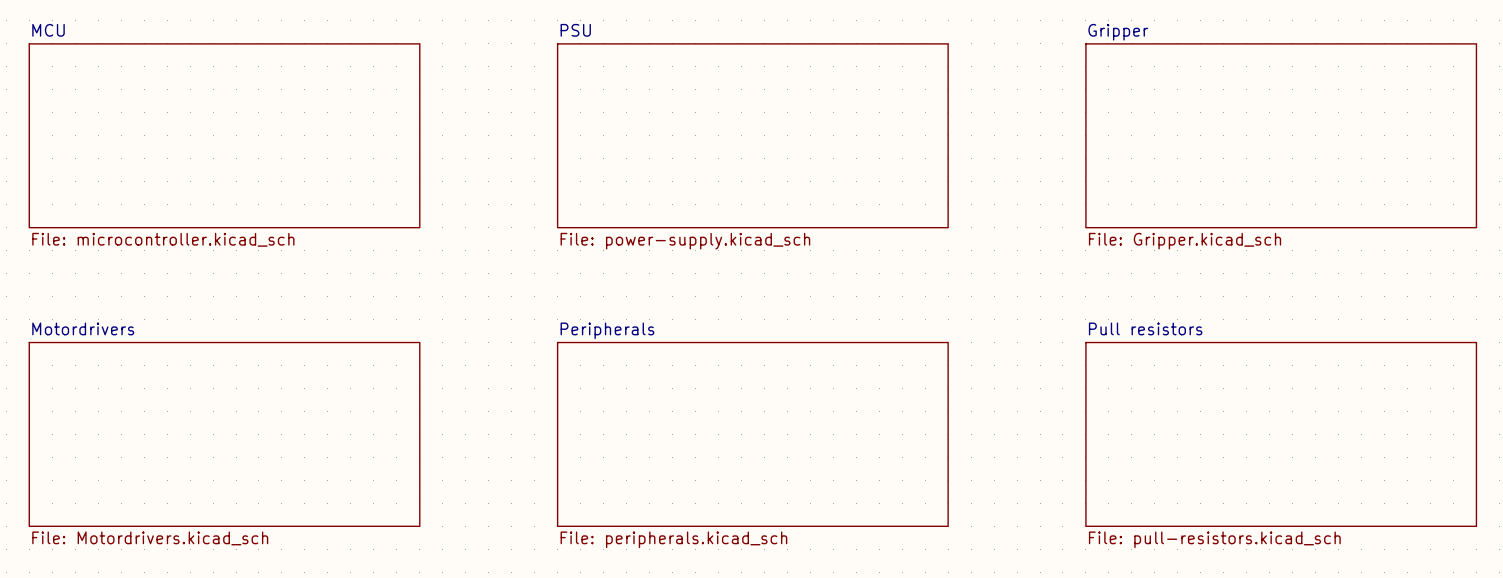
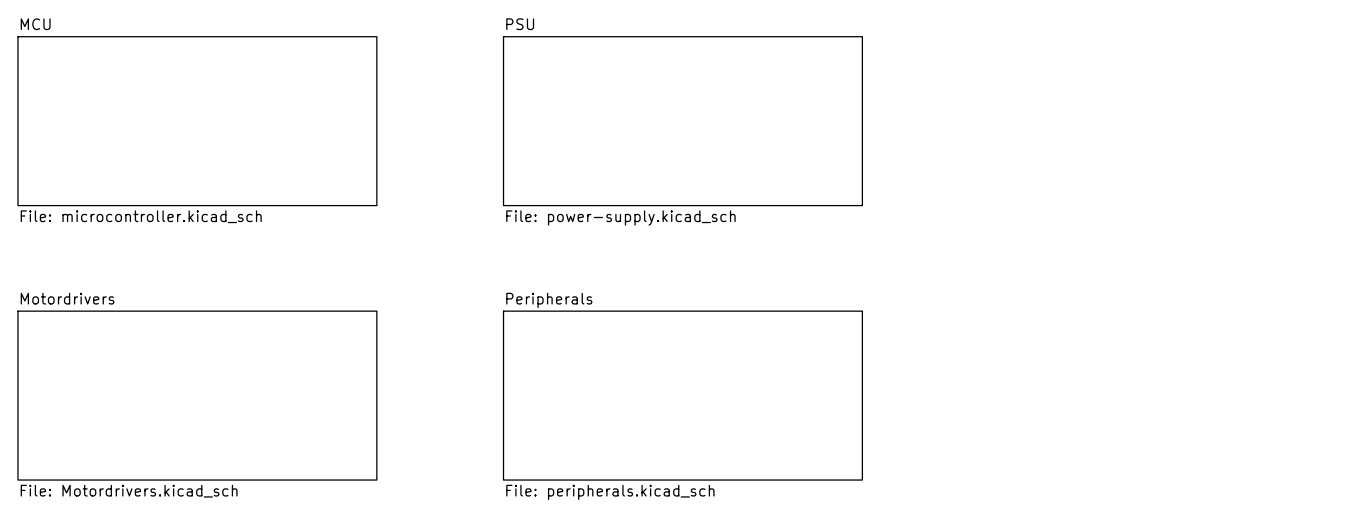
sheet Gripper: File: Gripper.kicad_sch (1281, 135) -> none
sheet Pull resistors: File: pull-resistors.kicad_sch (1281, 434) -> none

